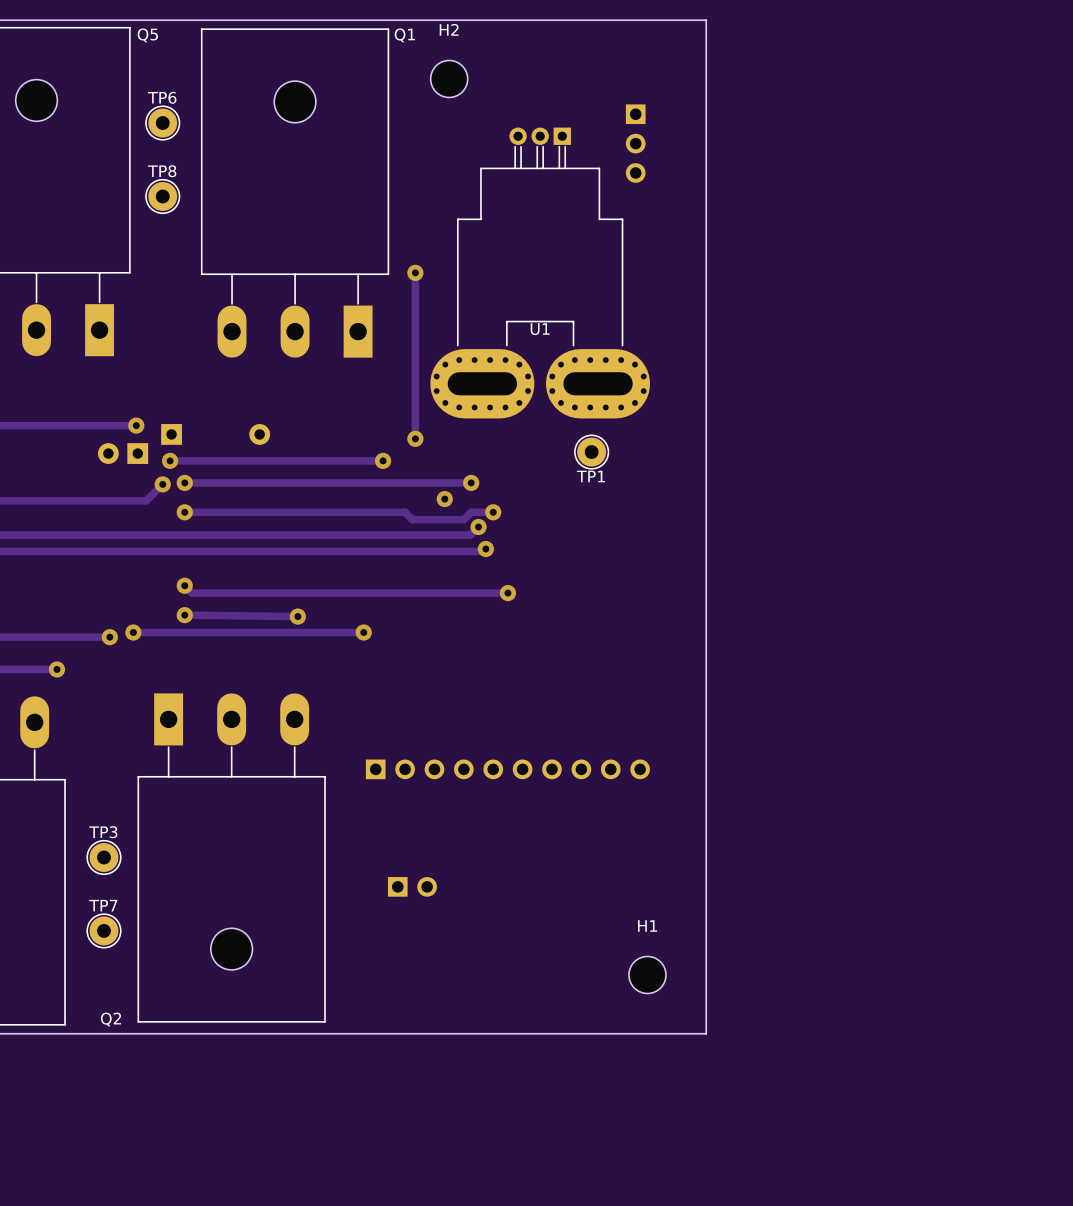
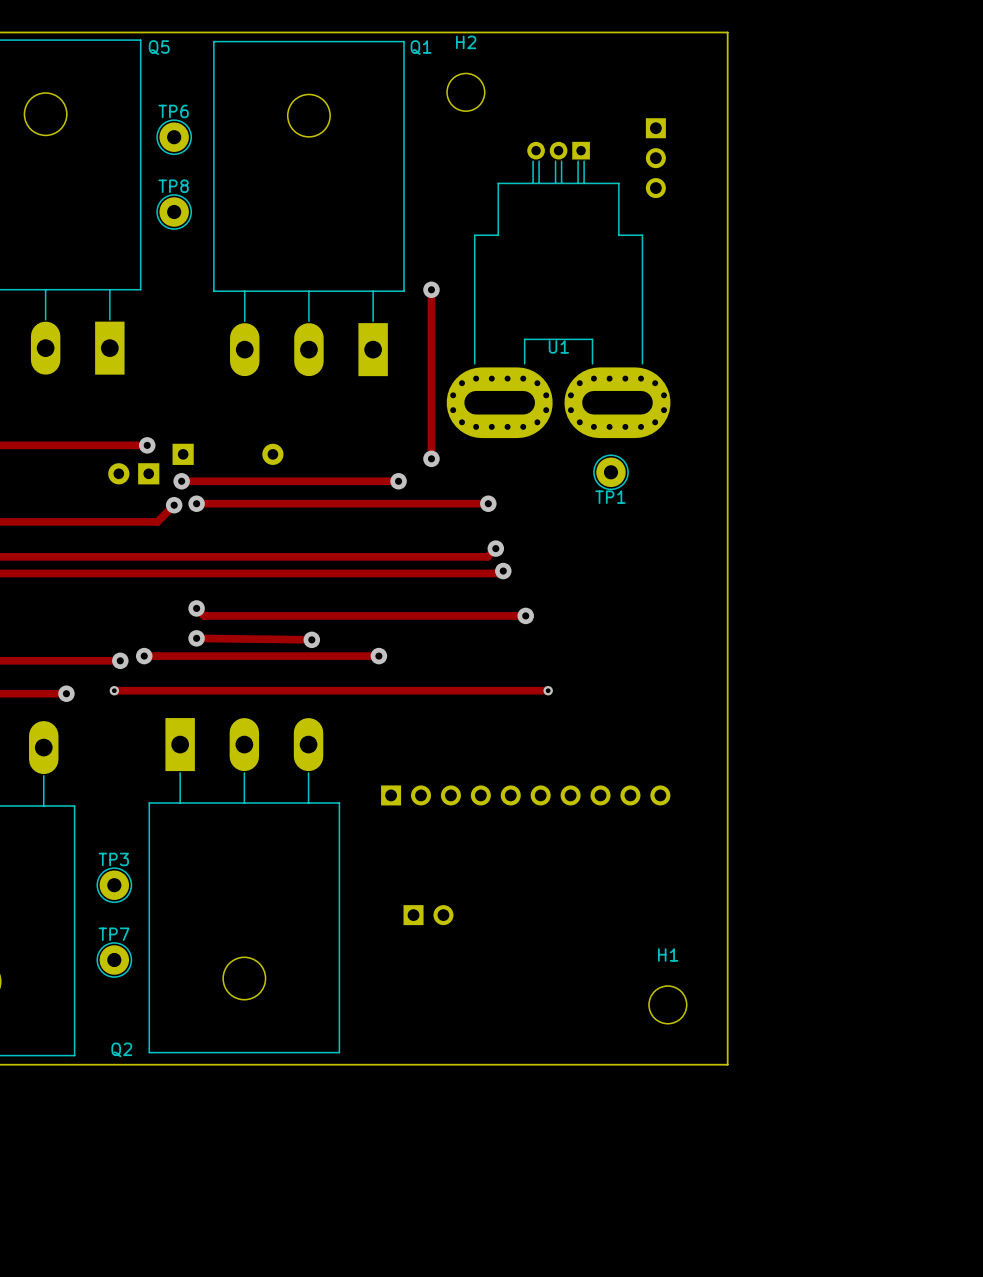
via: (444, 499) -> none
track: (184, 512) (405, 512) (412, 519) (463, 519) (471, 512) (493, 512) -> none
via: (184, 512) -> none
via: (493, 512) -> none
track: none -> (114, 690) (548, 690)
via: none -> (114, 690)
via: none -> (548, 690)

